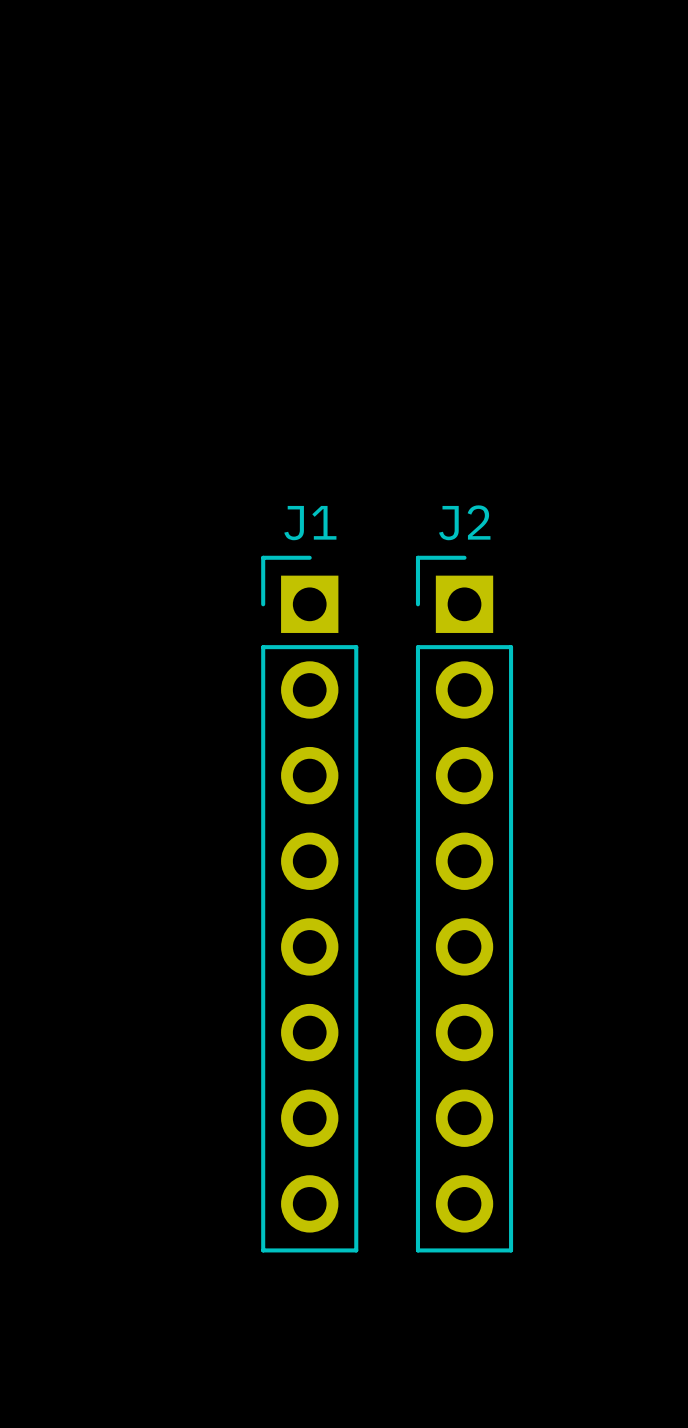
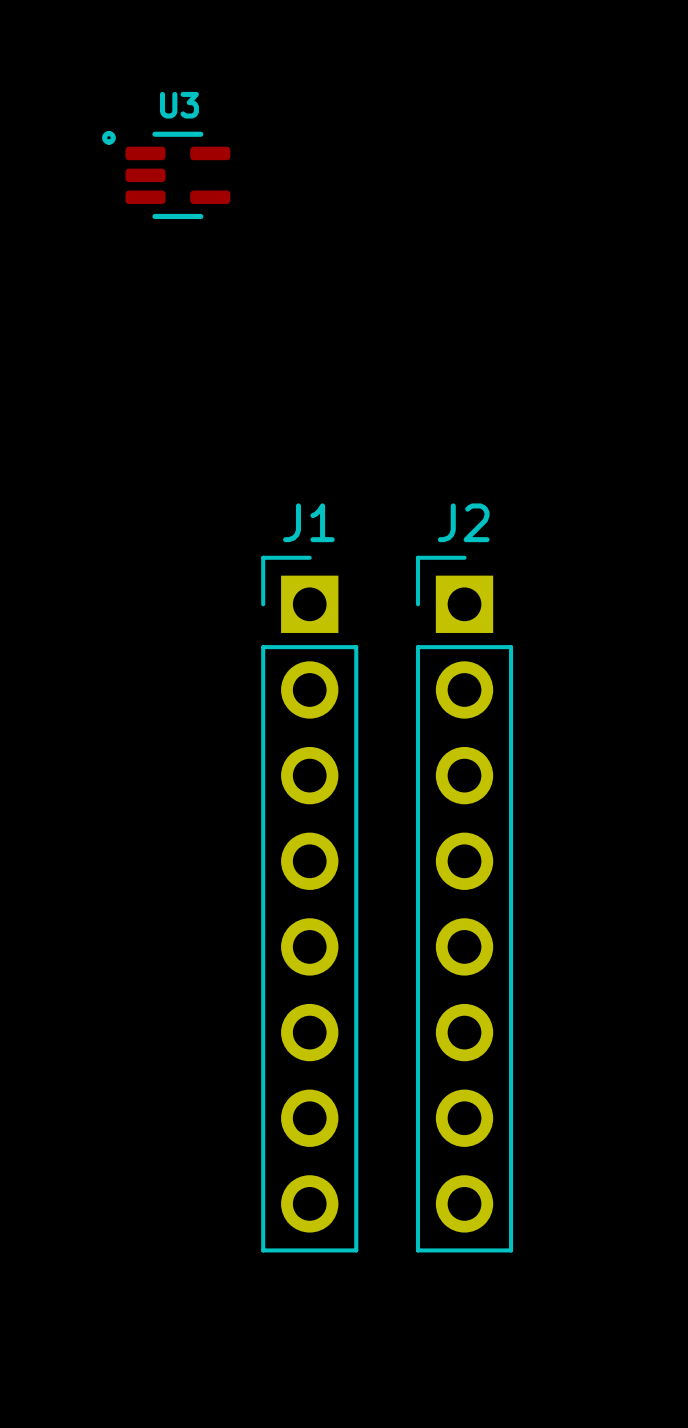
U3: none -> (166, 175)

